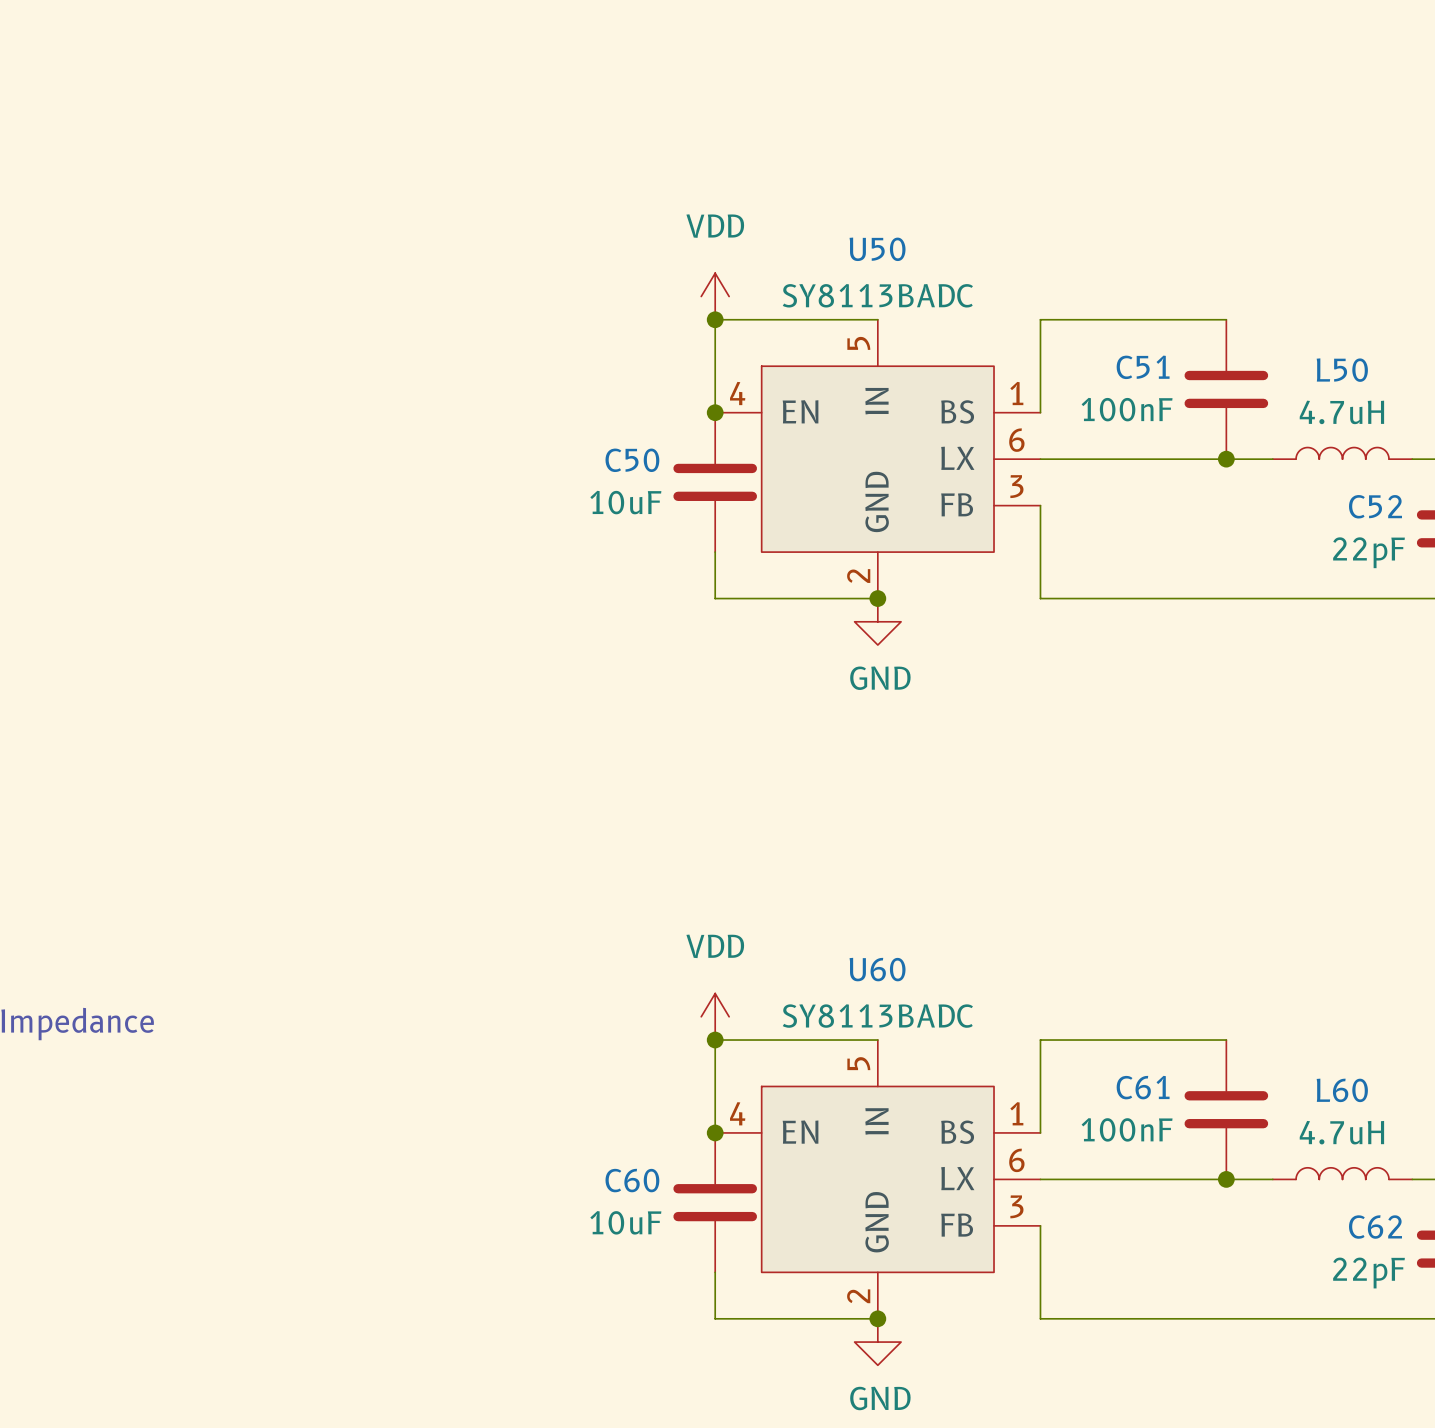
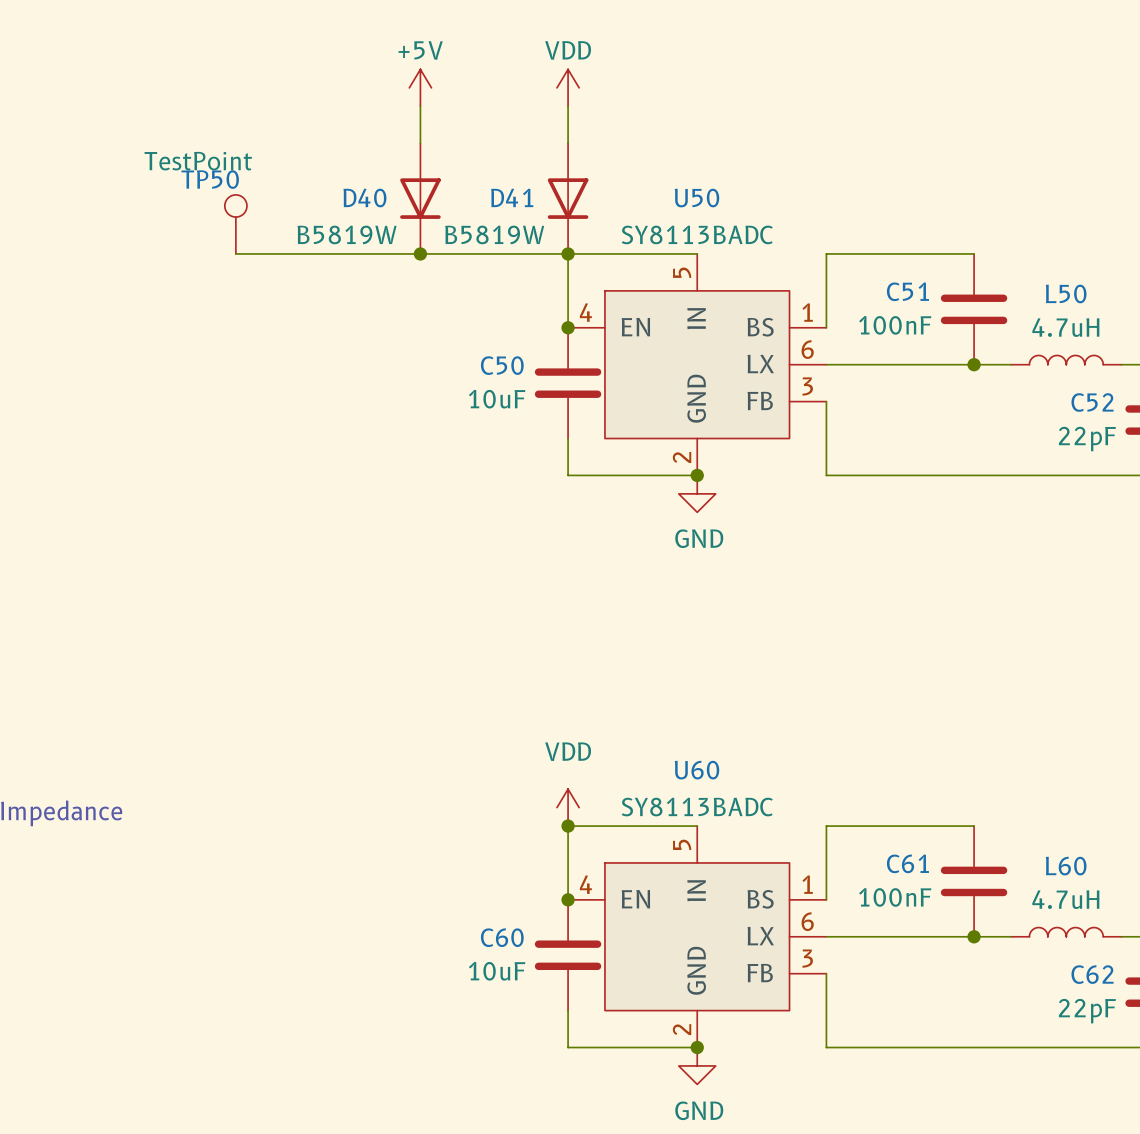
power symbol: none -> +5V (420, 87)
wire: none -> (420, 106) (420, 143)
wire: none -> (568, 106) (568, 143)
power symbol text position: VDD (715, 226) -> VDD (568, 50)
D40: none -> B5819W (420, 198)
D41: none -> B5819W (568, 198)
TP50: none -> TestPoint (235, 224)
power symbol position: VDD (715, 296) -> VDD (568, 87)
wire: none -> (235, 253) (568, 253)
junction: none -> (420, 253)

